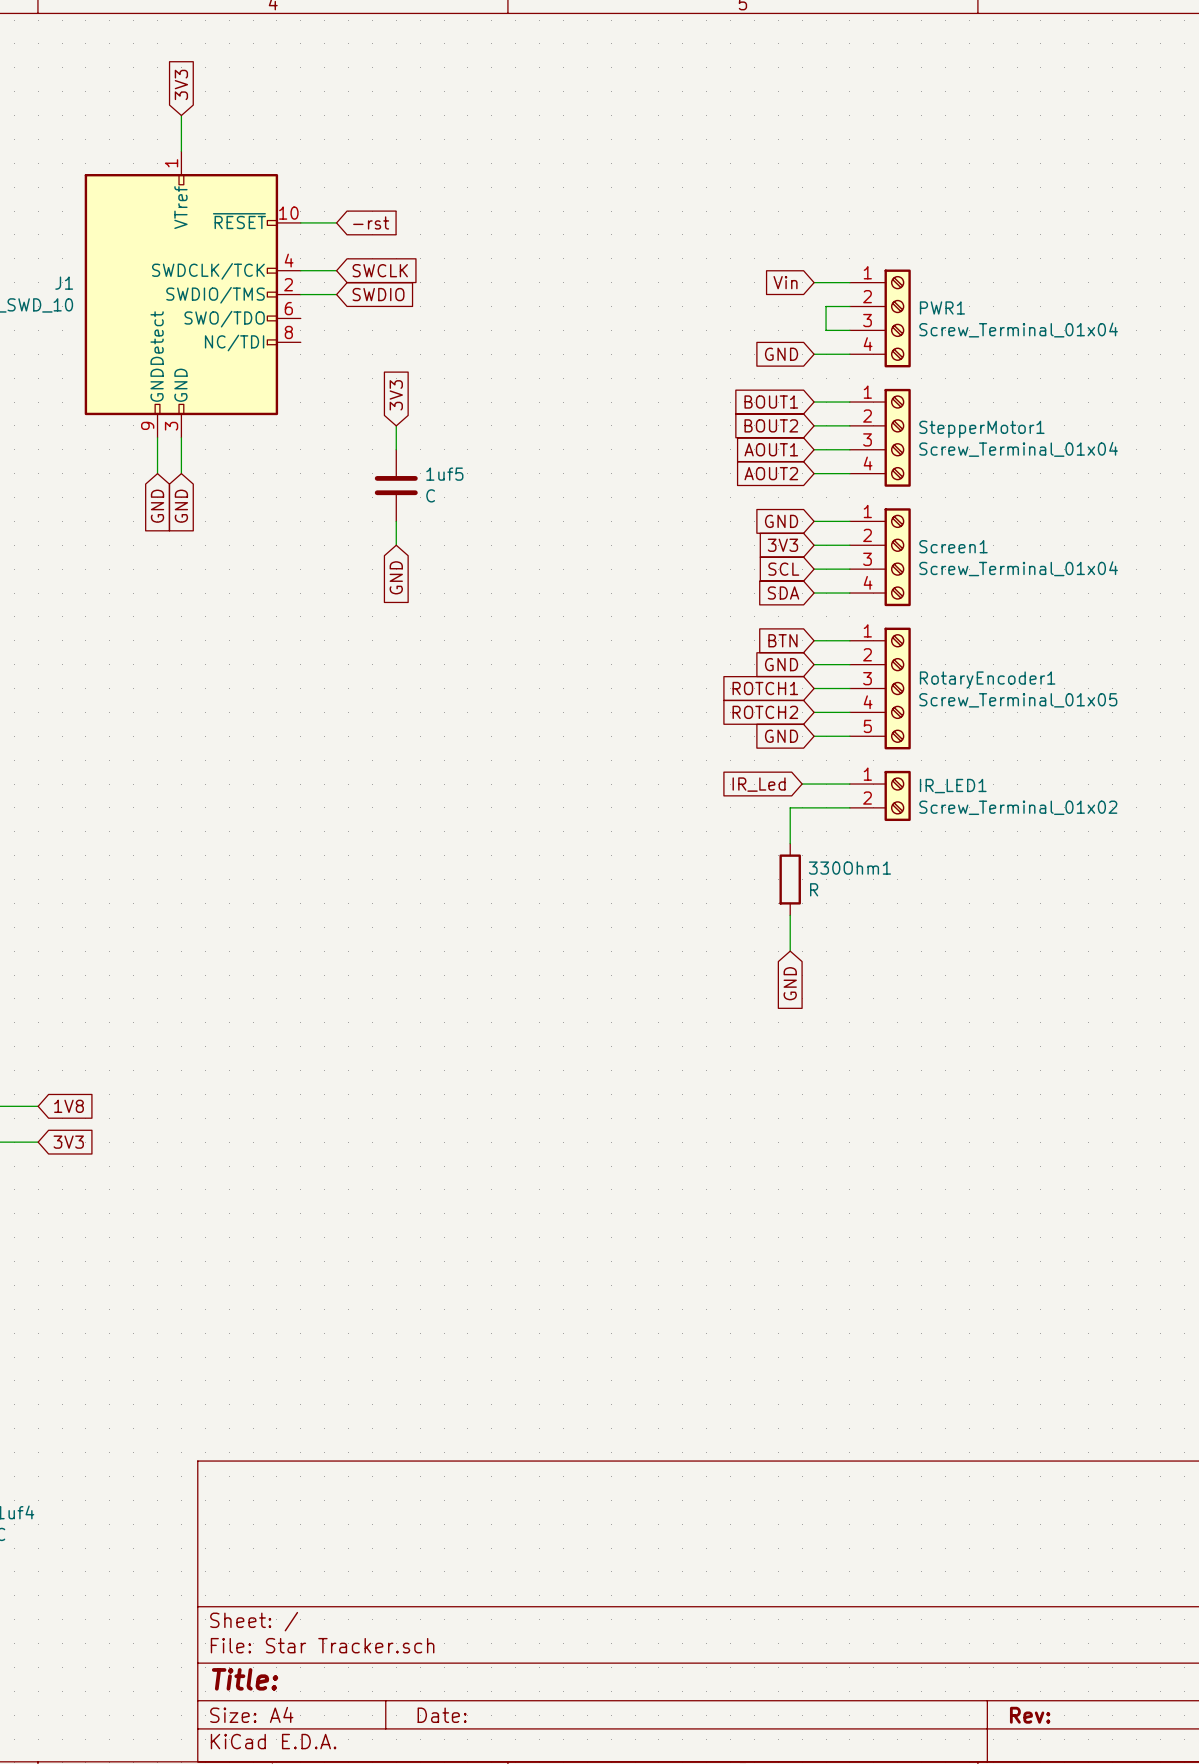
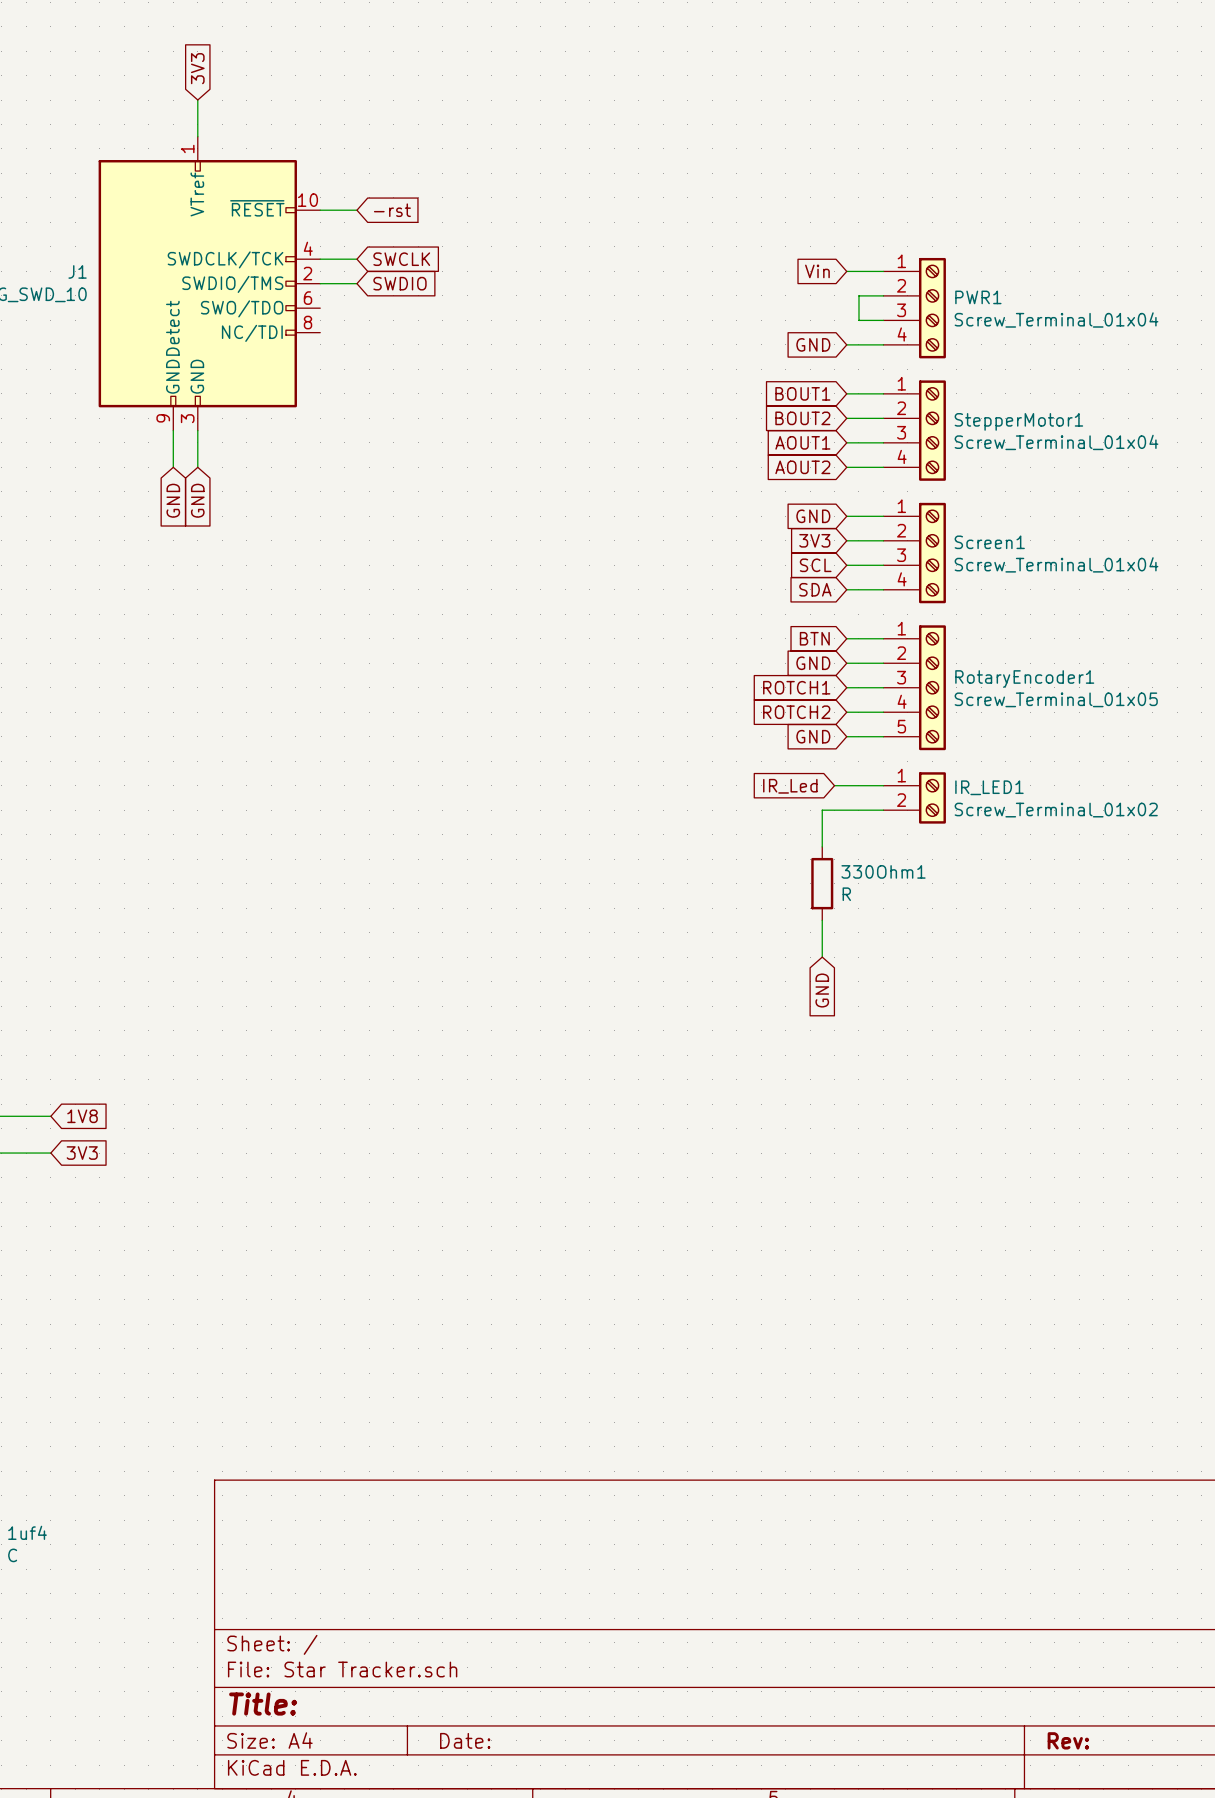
global label: 3V3 (396, 395) -> none
wire: (396, 425) (396, 449) -> none
1uf5: C (396, 485) -> none
wire: (396, 521) (396, 545) -> none
global label: GND (396, 577) -> none

